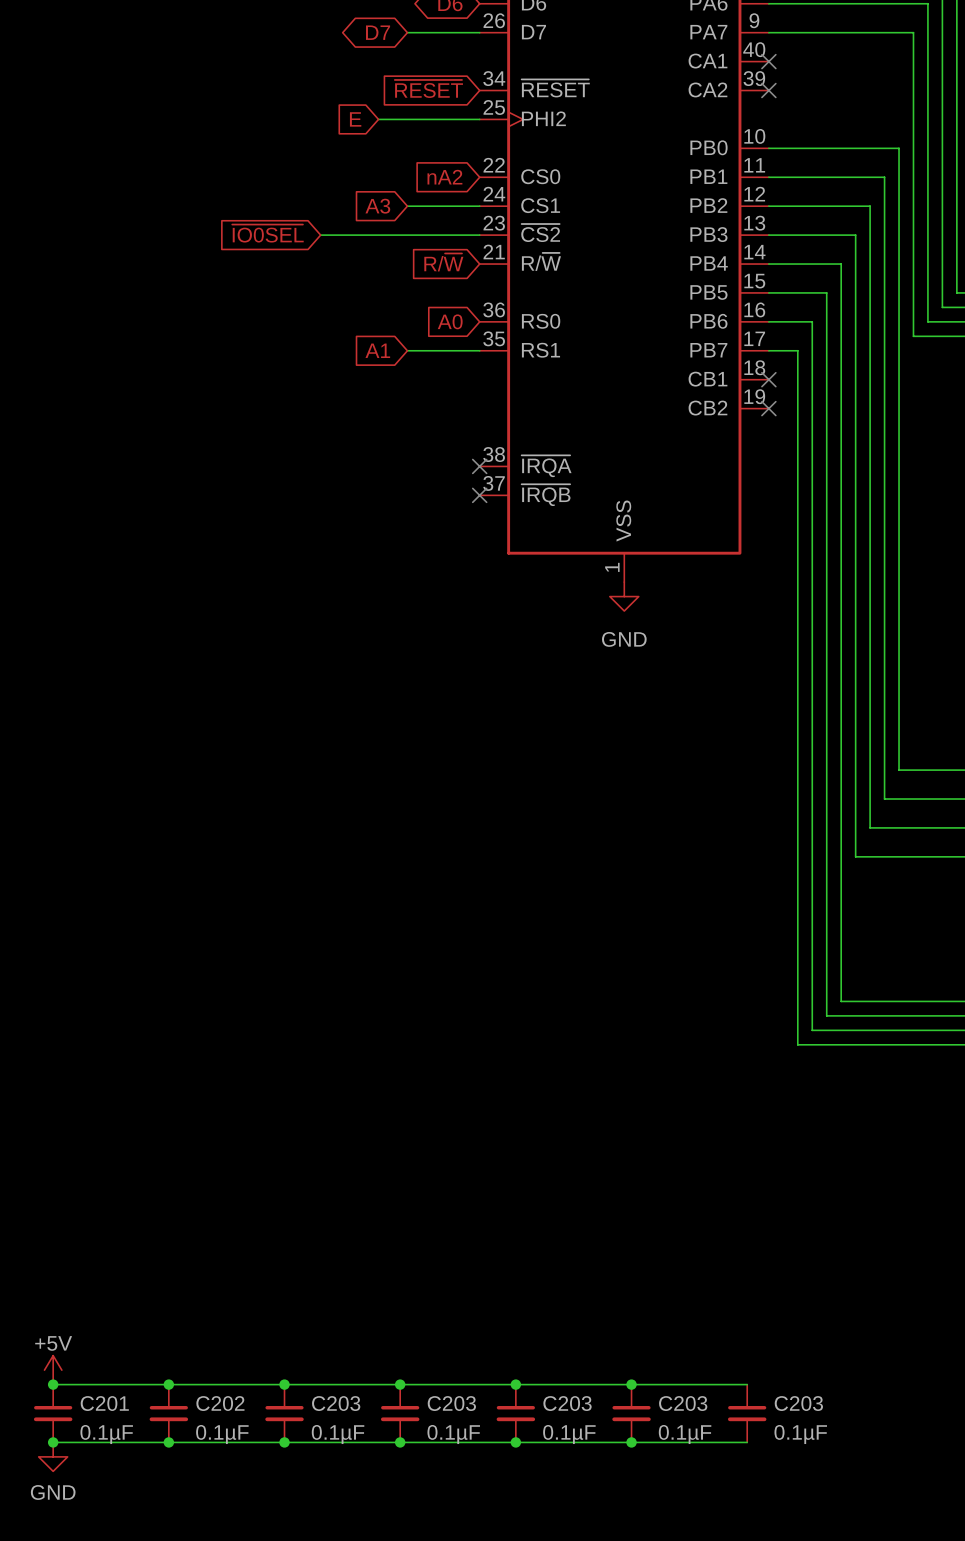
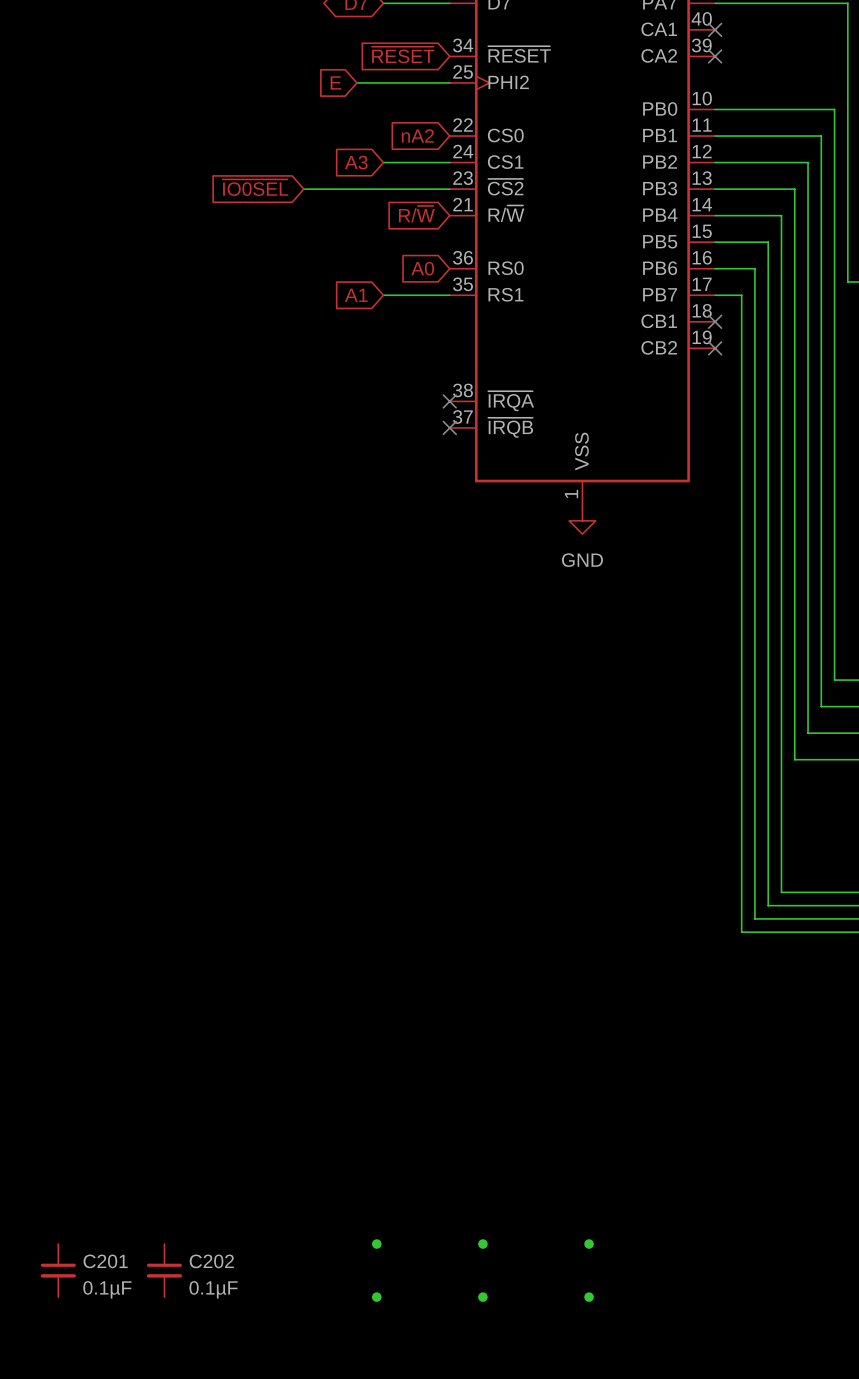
power symbol: +5V (53, 1370) -> none
wire: (53, 1384) (747, 1384) -> none
junction: (53, 1384) -> none
junction: (168, 1384) -> none
junction: (284, 1384) -> none
C203: 0.1µF (284, 1413) -> none
C203: 0.1µF (400, 1413) -> none
C203: 0.1µF (515, 1413) -> none
C203: 0.1µF (631, 1413) -> none
C203: 0.1µF (747, 1413) -> none
wire: (53, 1442) (747, 1442) -> none
junction: (53, 1442) -> none
junction: (168, 1442) -> none
junction: (284, 1442) -> none
power symbol: GND (53, 1456) -> none

